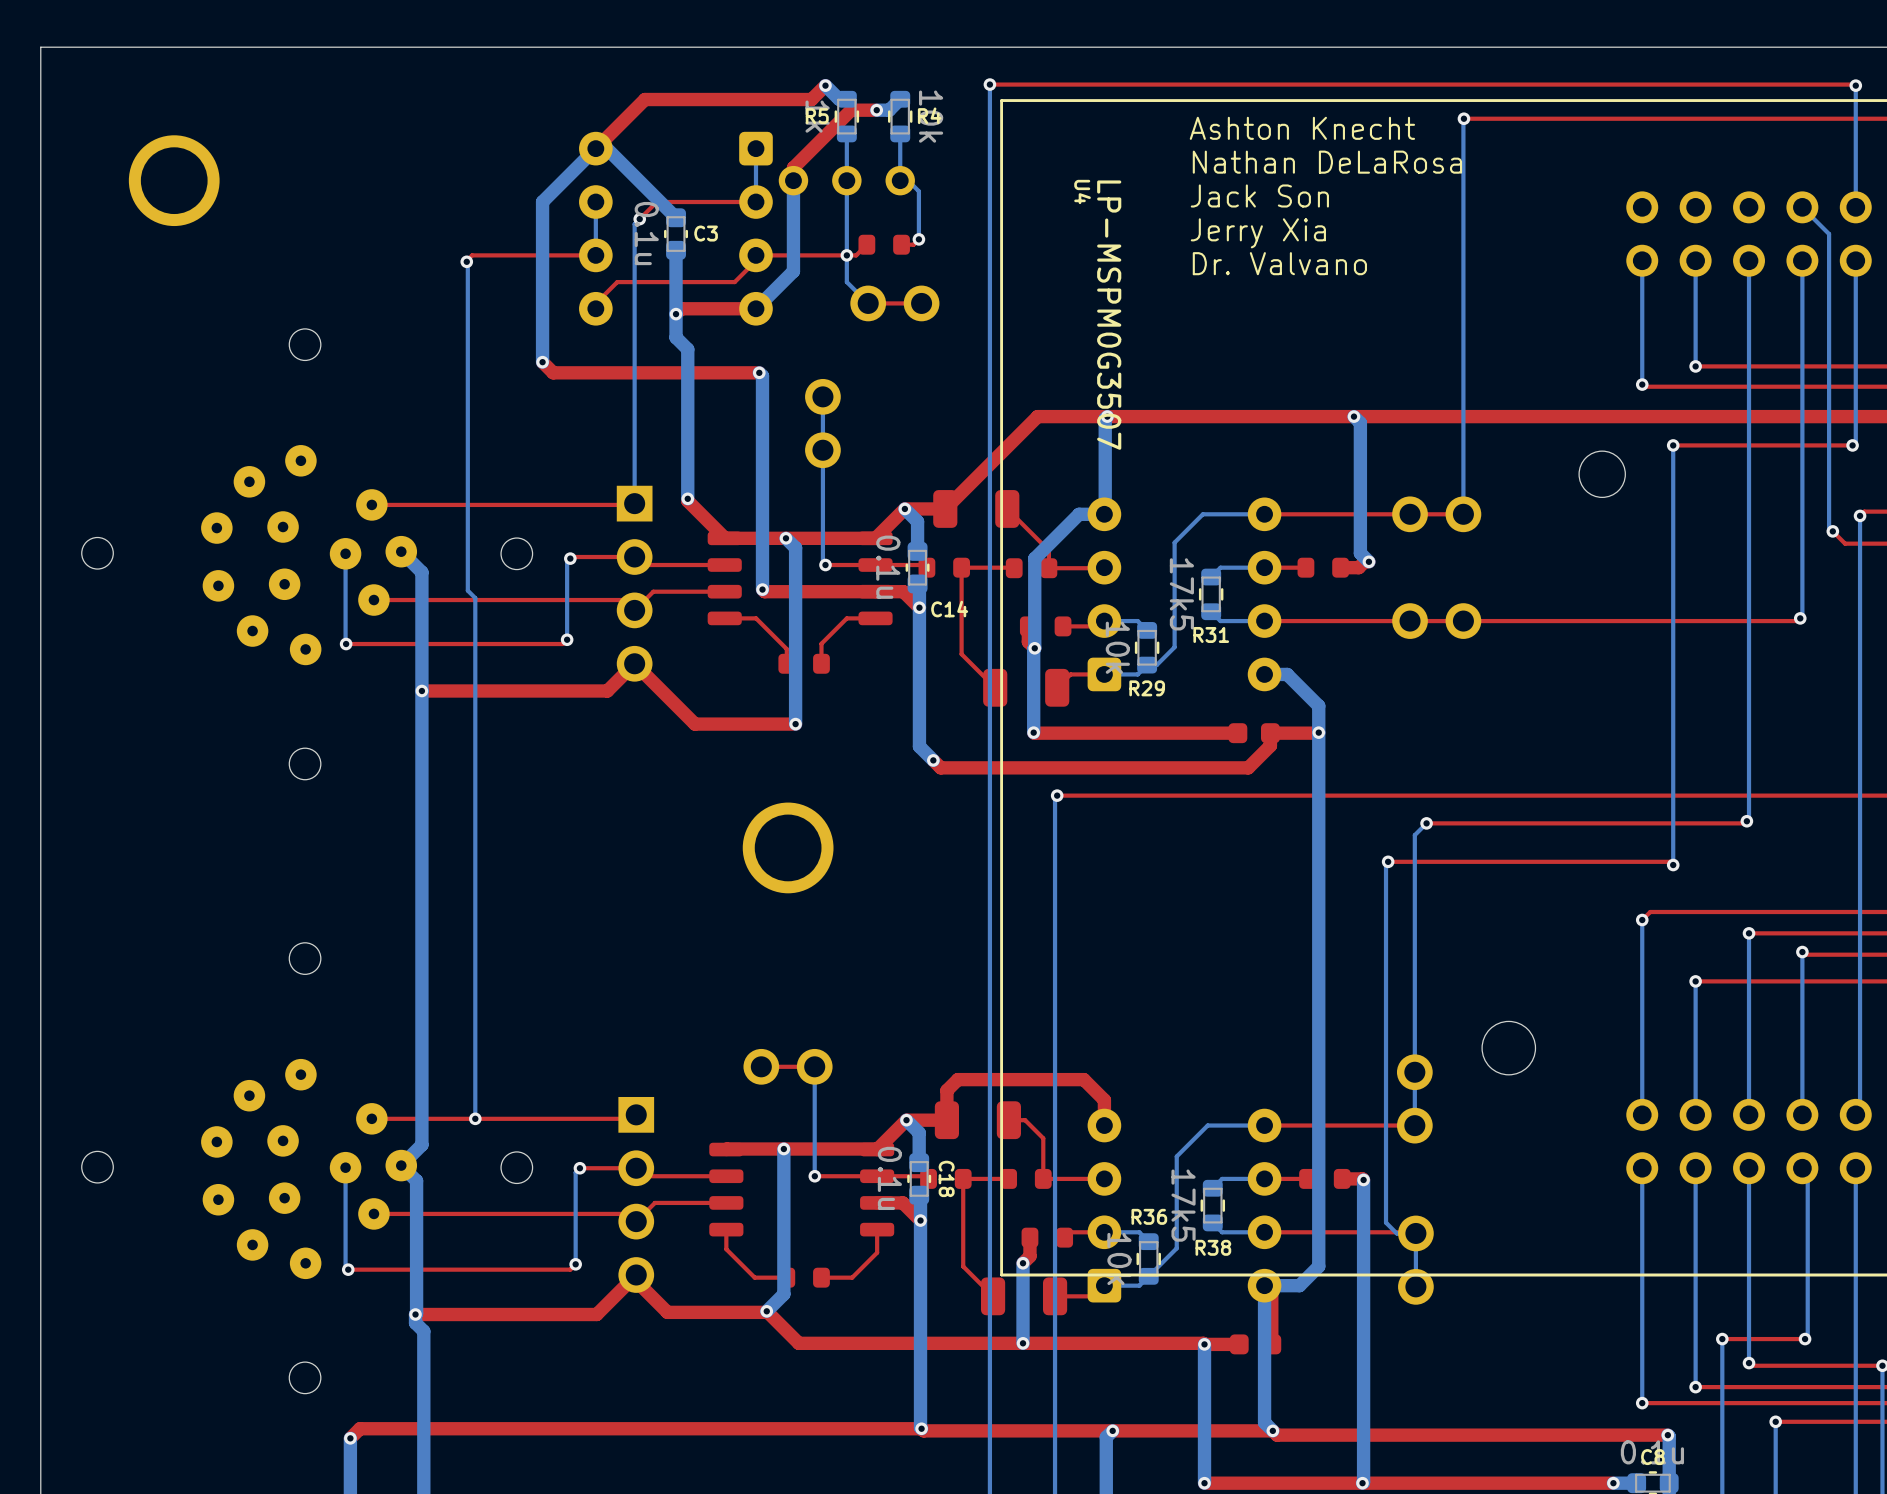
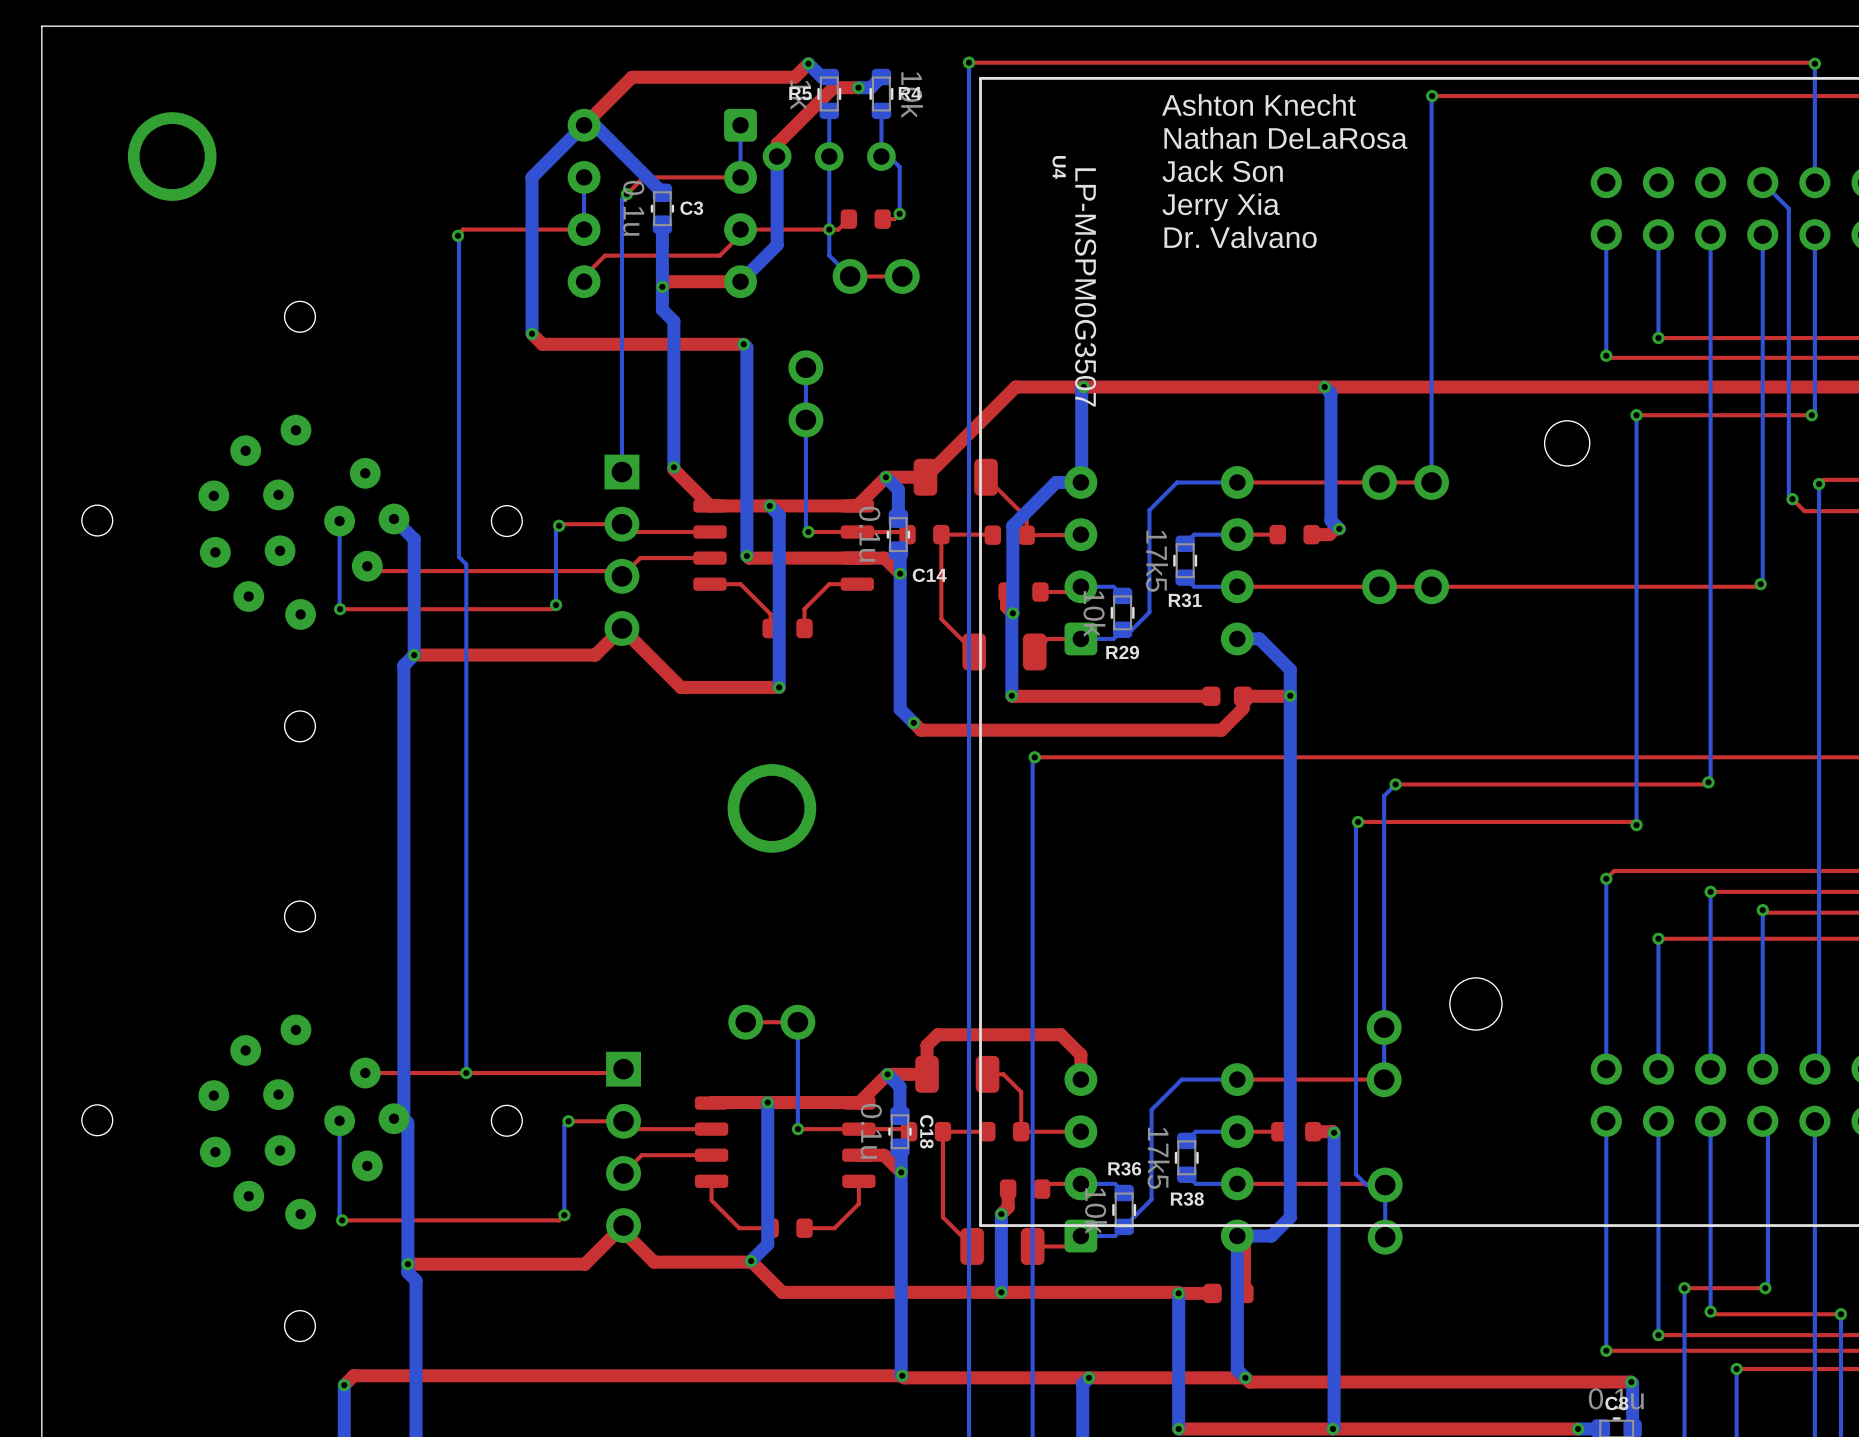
top track: (633, 504) (371, 504) -> none
top track: (624, 600) (373, 600) -> none
top track: none -> (616, 571) (374, 571)
bottom track: (421, 690) (421, 1144) (401, 1165) (416, 1180) (415, 1314) -> (414, 655) (403, 665) (403, 1118)
bottom track: none -> (407, 1122) (407, 1264)
top track: (628, 1213) (373, 1213) -> none

